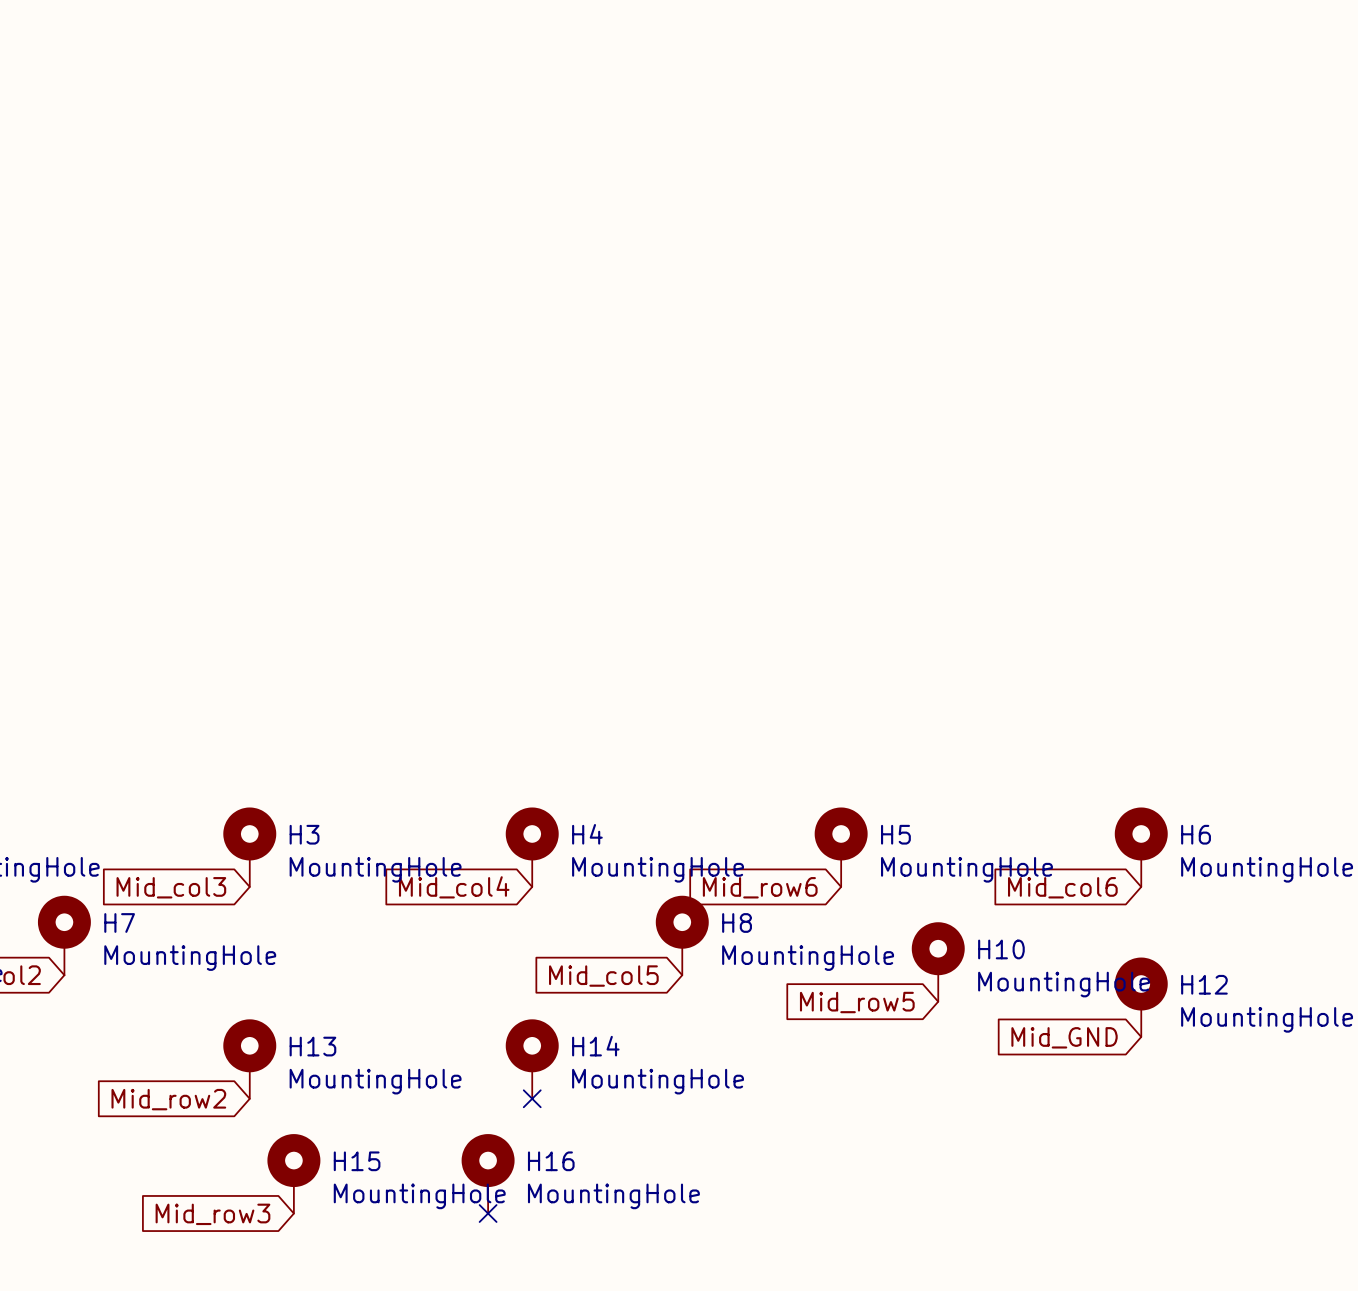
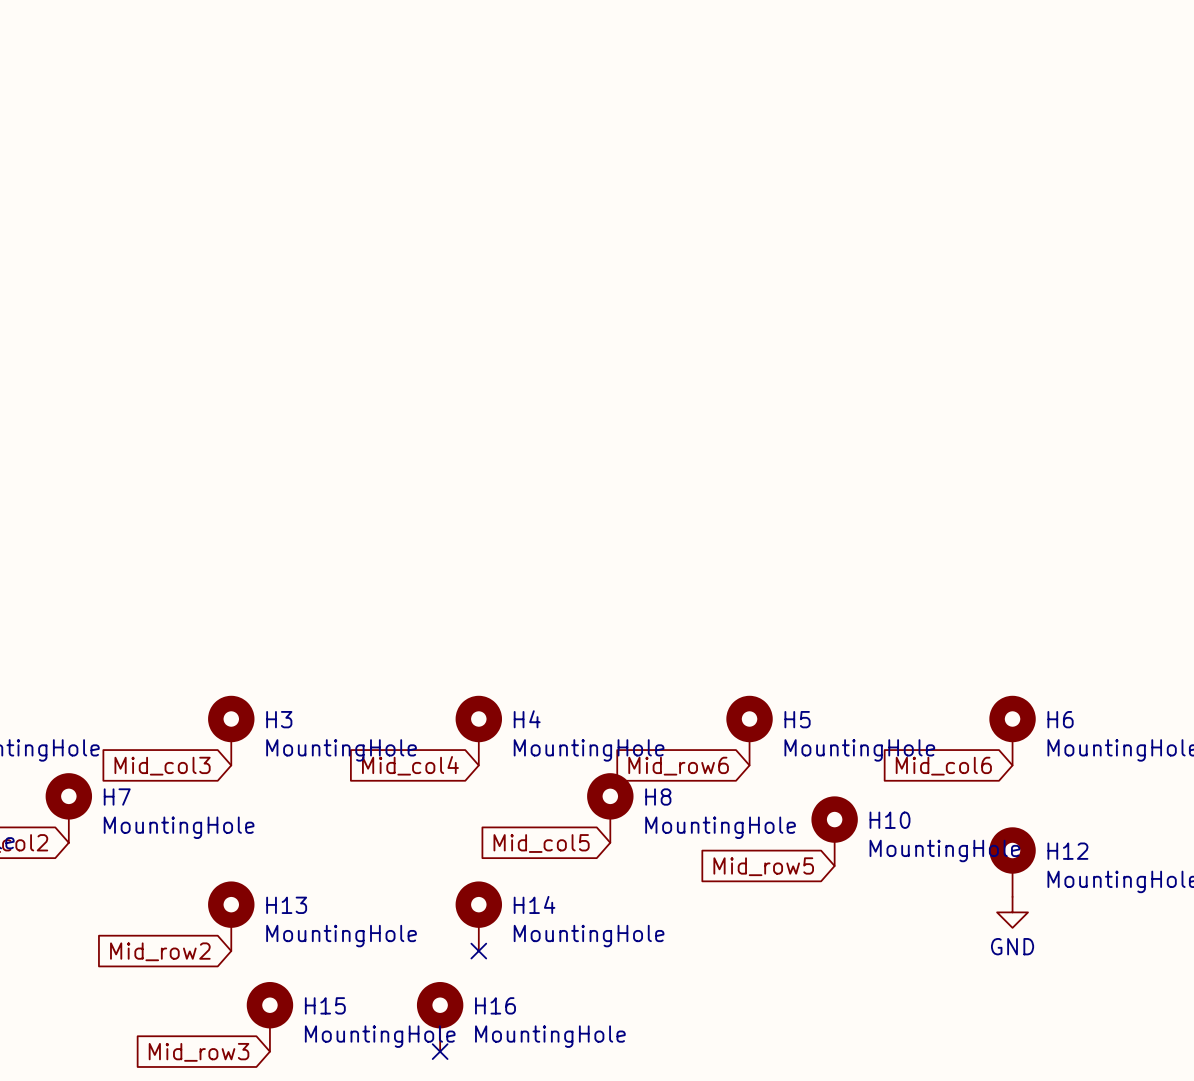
global label: Mid_GND (1064, 1037) -> none
power symbol: none -> GND (1012, 912)

